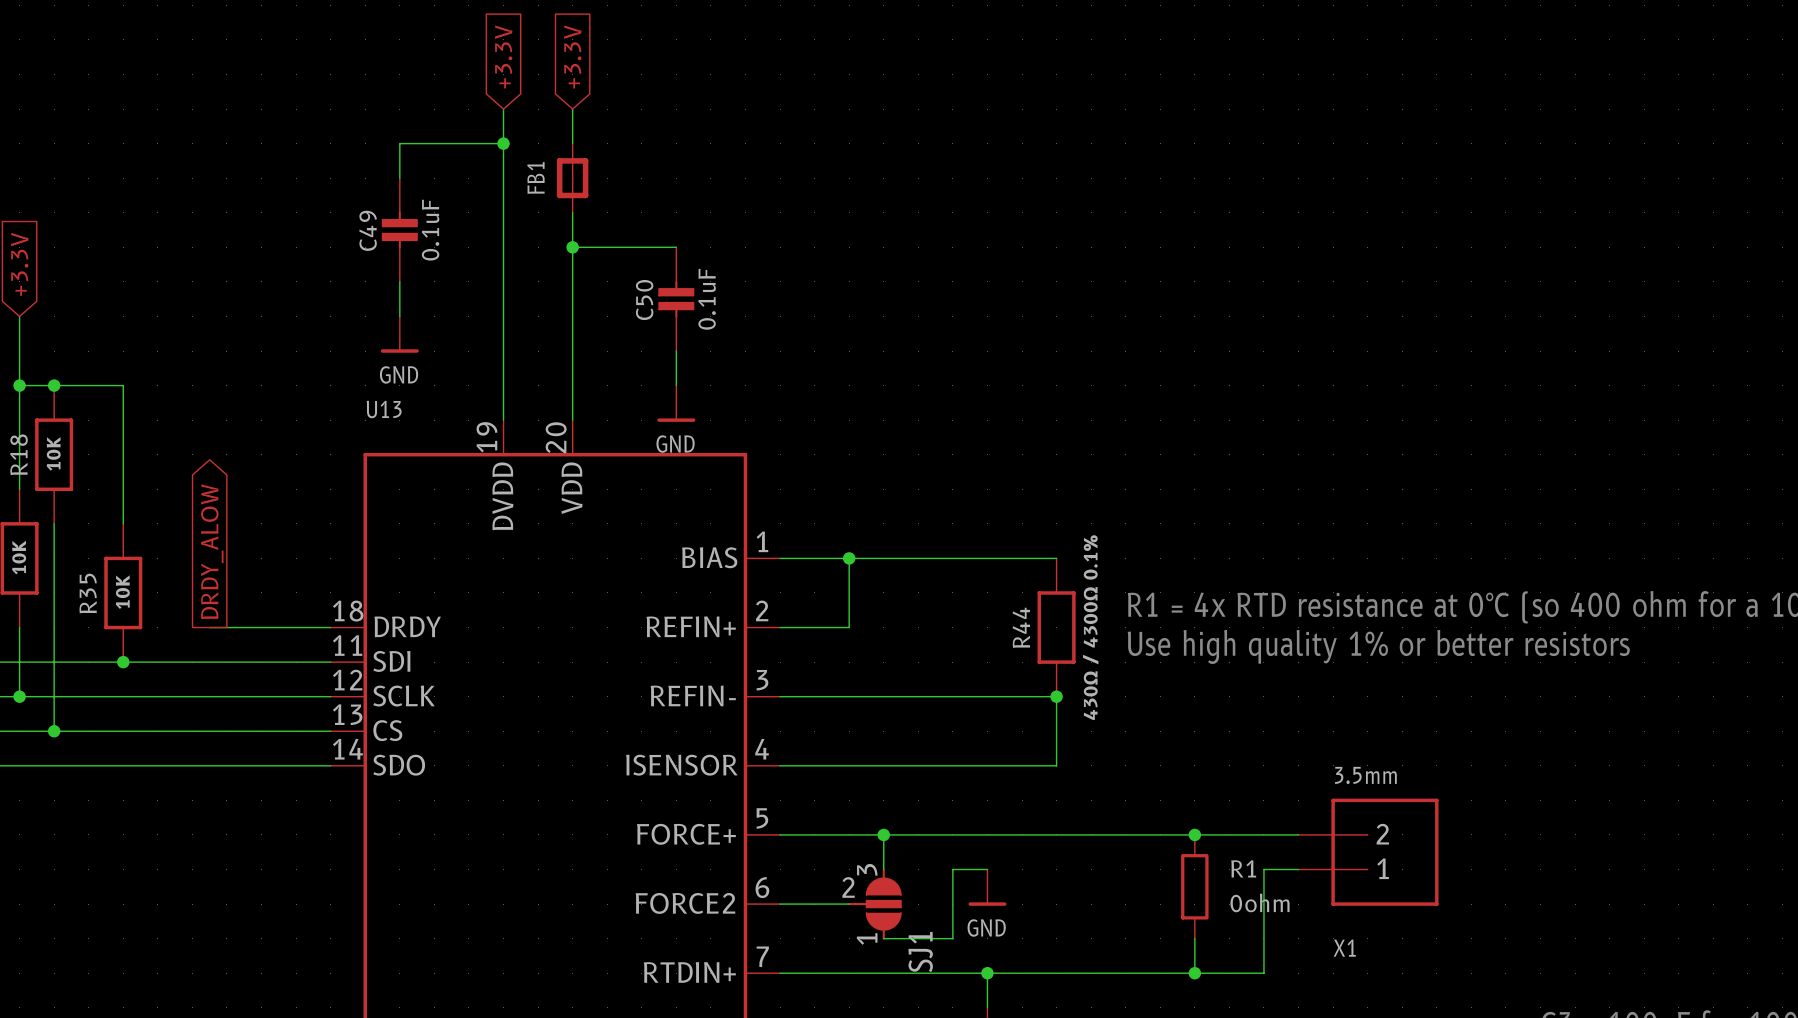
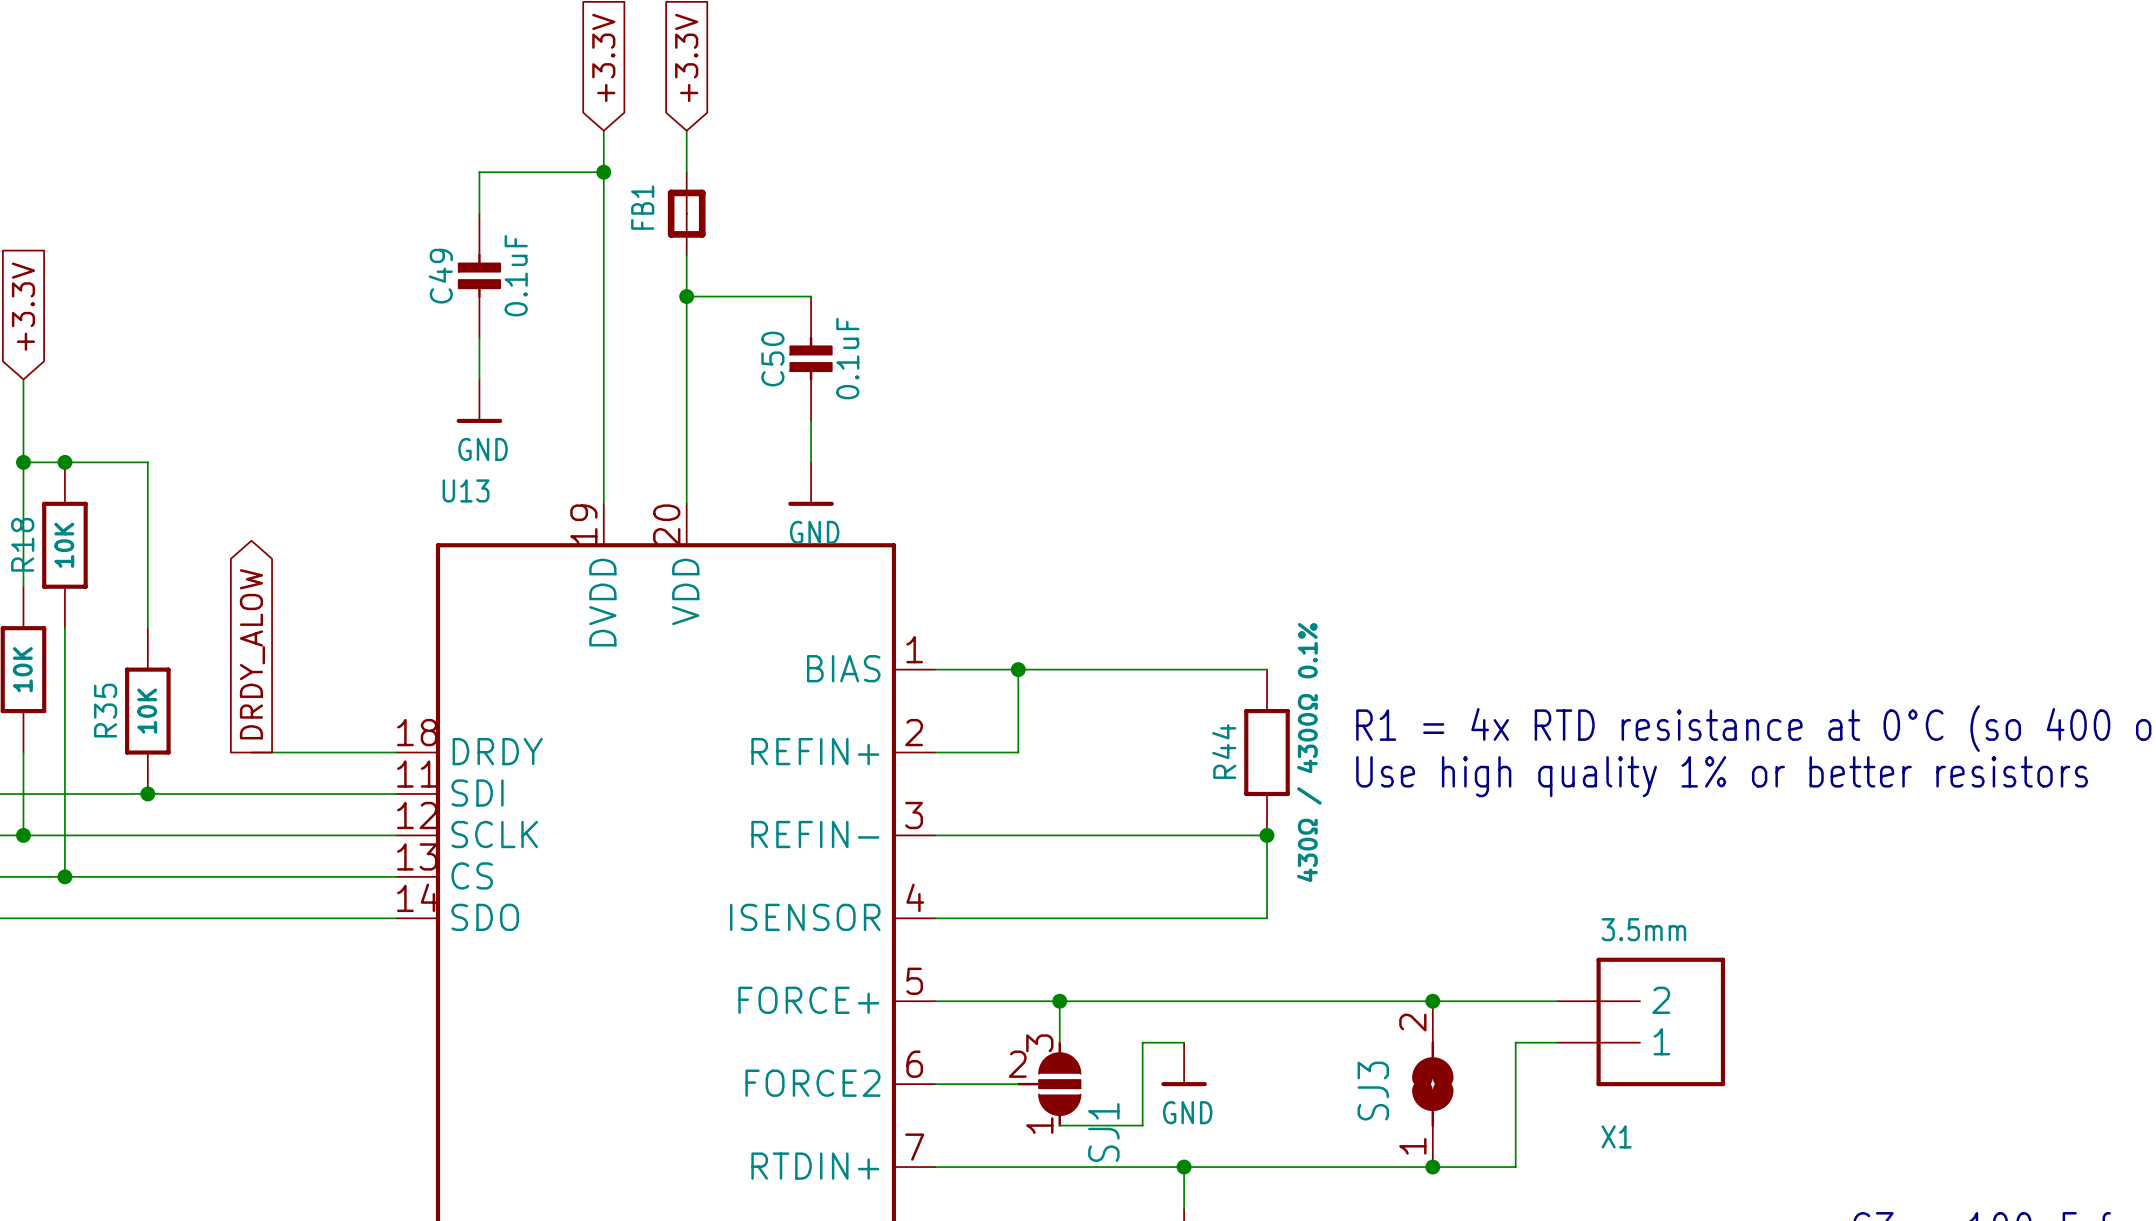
R1: 0ohm (1194, 886) -> none
SJ3: none -> (1432, 1084)

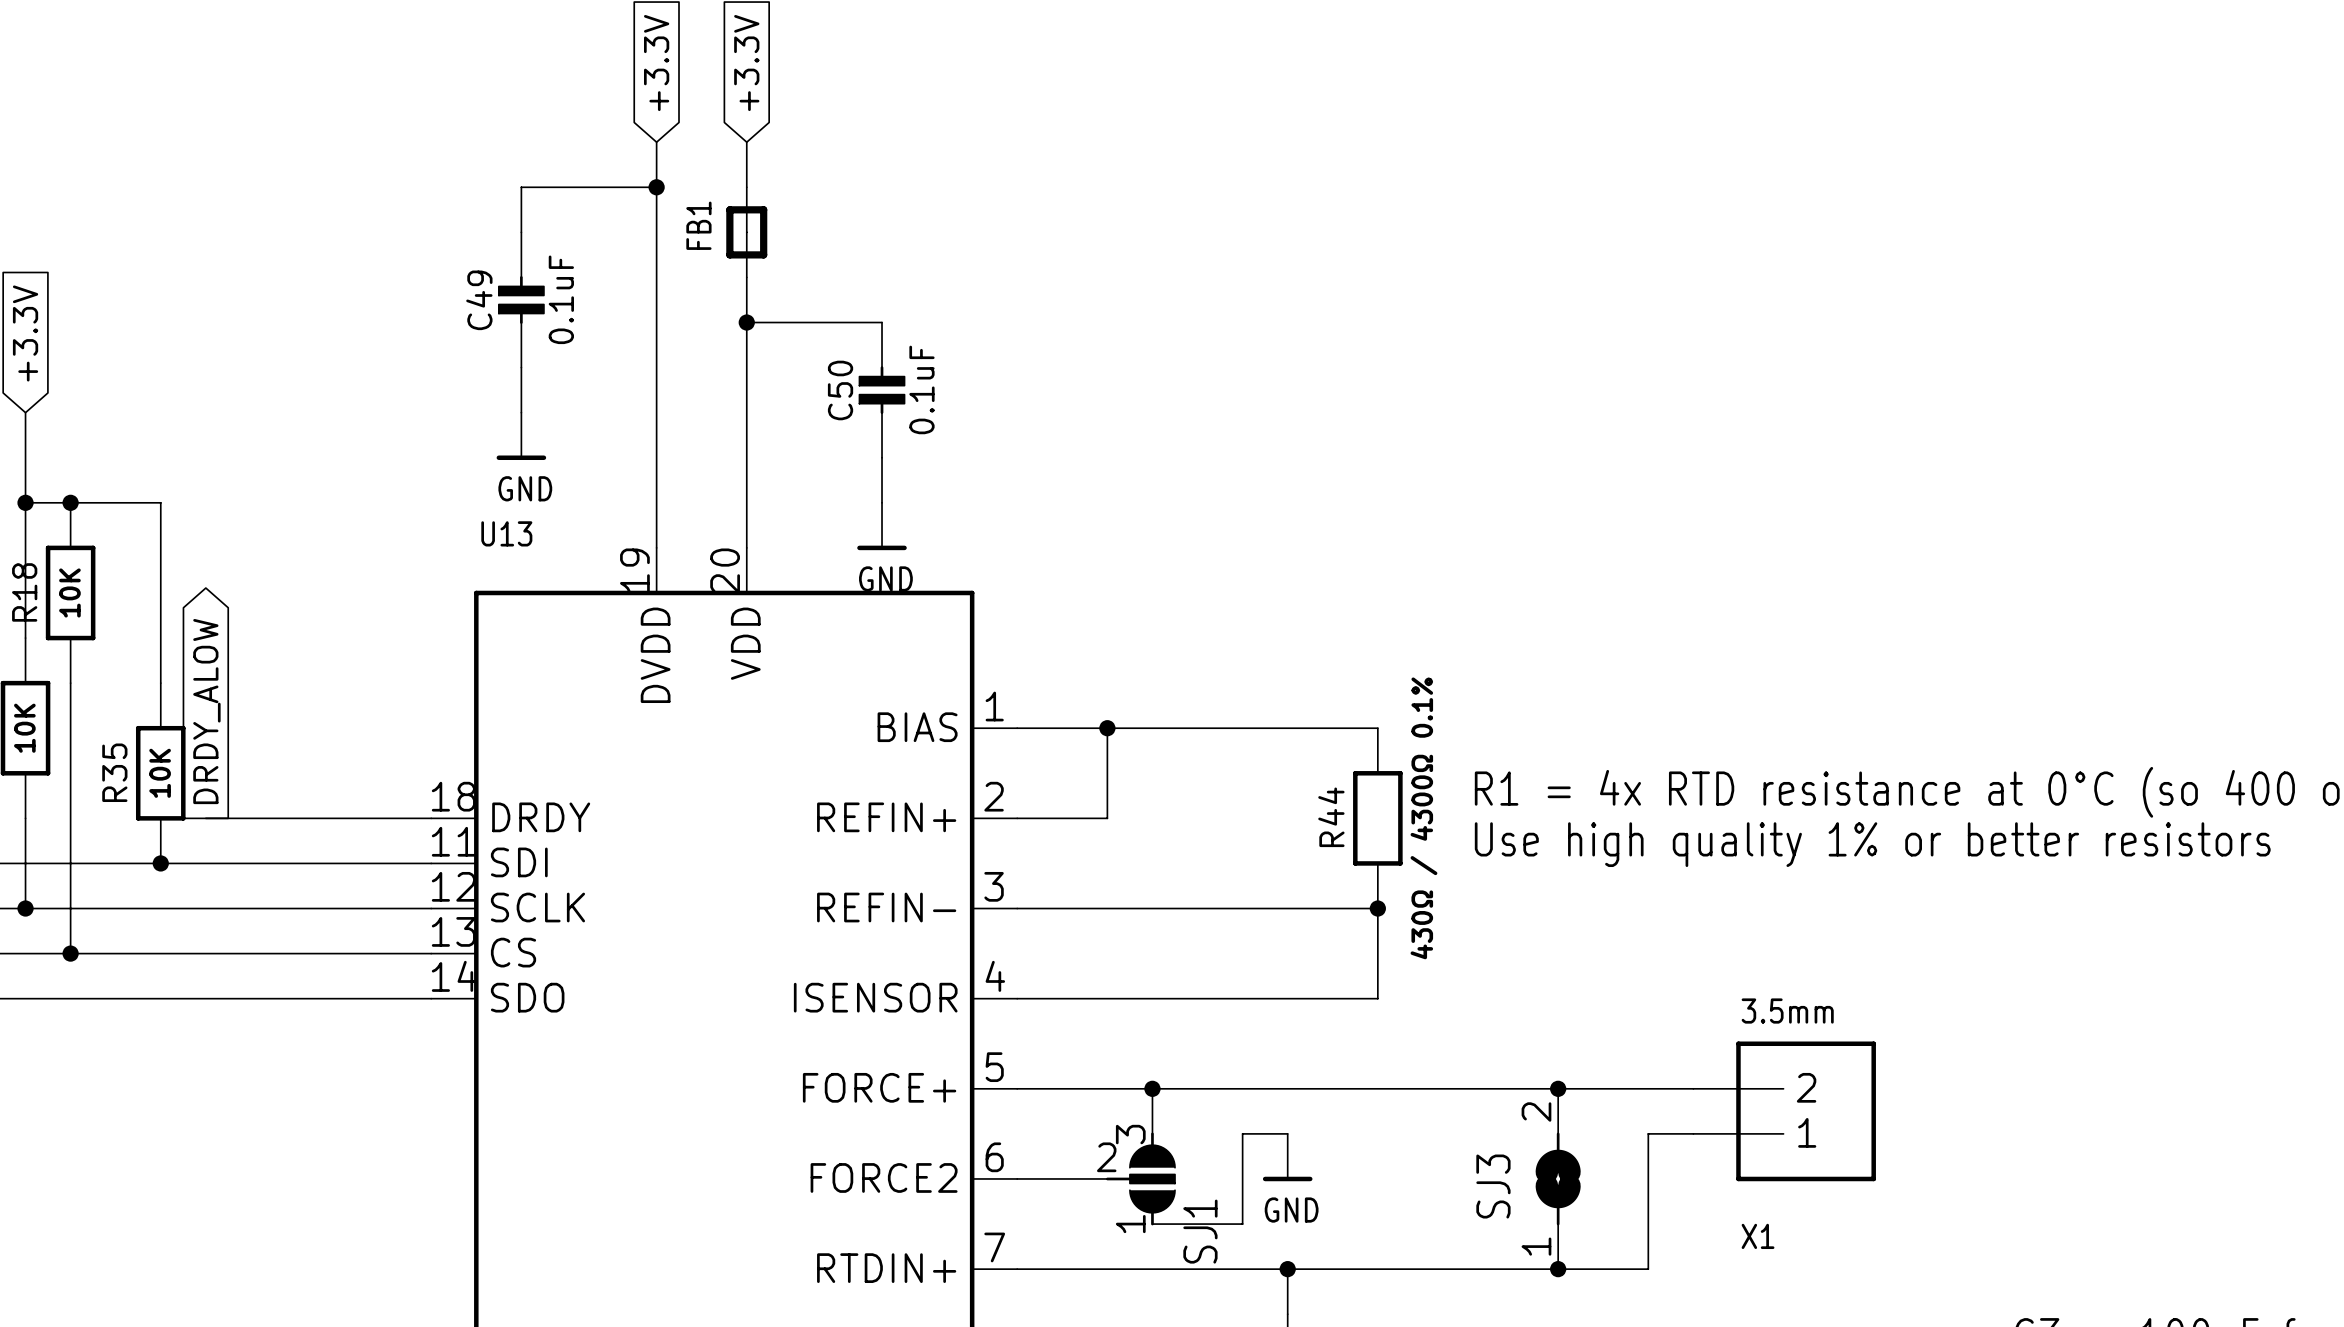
global label position: DRDY_ALOW (252, 654) -> DRDY_ALOW (206, 711)
wire: none -> (205, 818) (273, 818)

